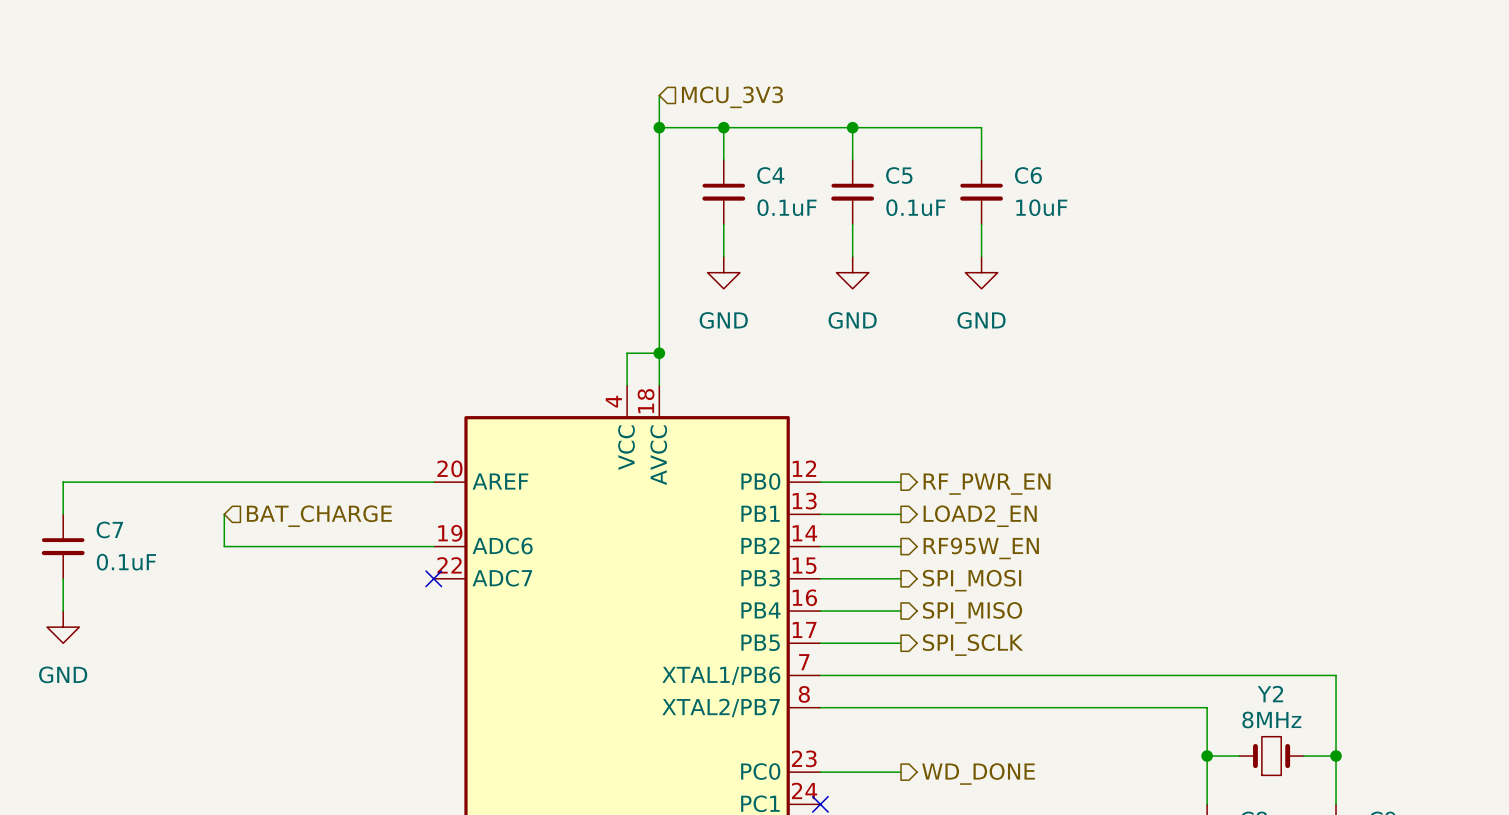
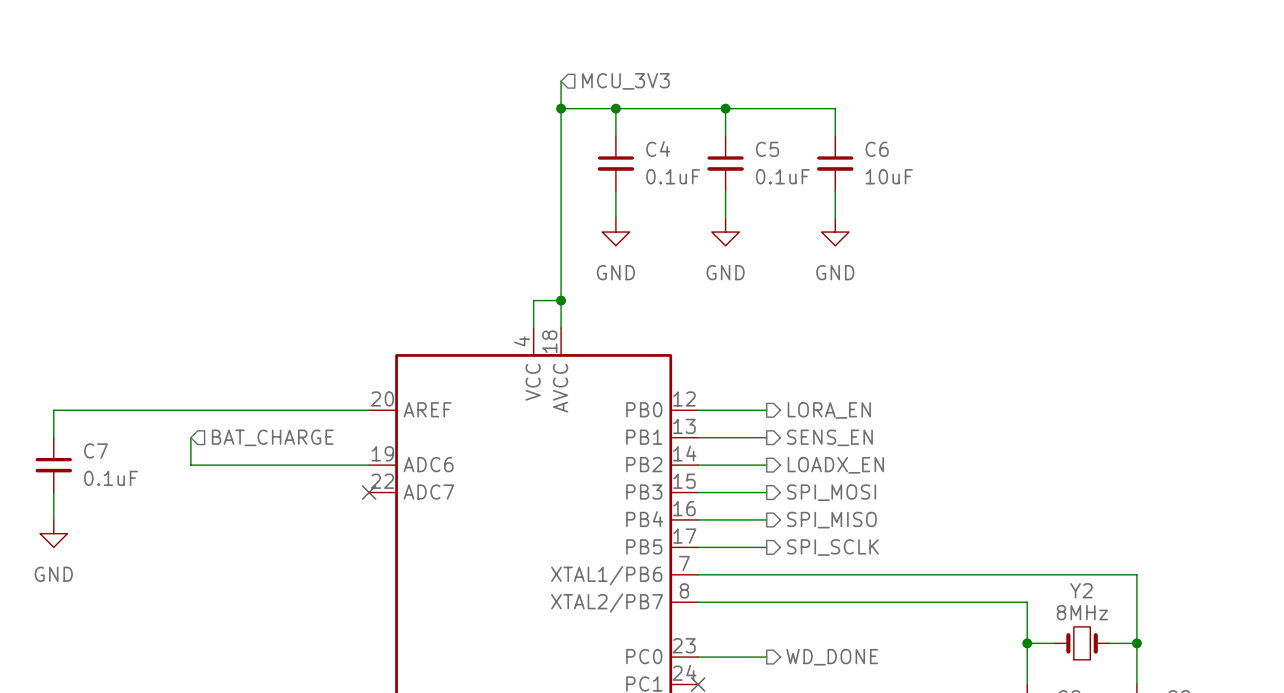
hierarchical label: RF_PWR_EN (987, 484) -> LORA_EN (829, 410)
hierarchical label: LOAD2_EN (980, 516) -> SENS_EN (829, 437)
hierarchical label: RF95W_EN (981, 548) -> LOADX_EN (835, 465)

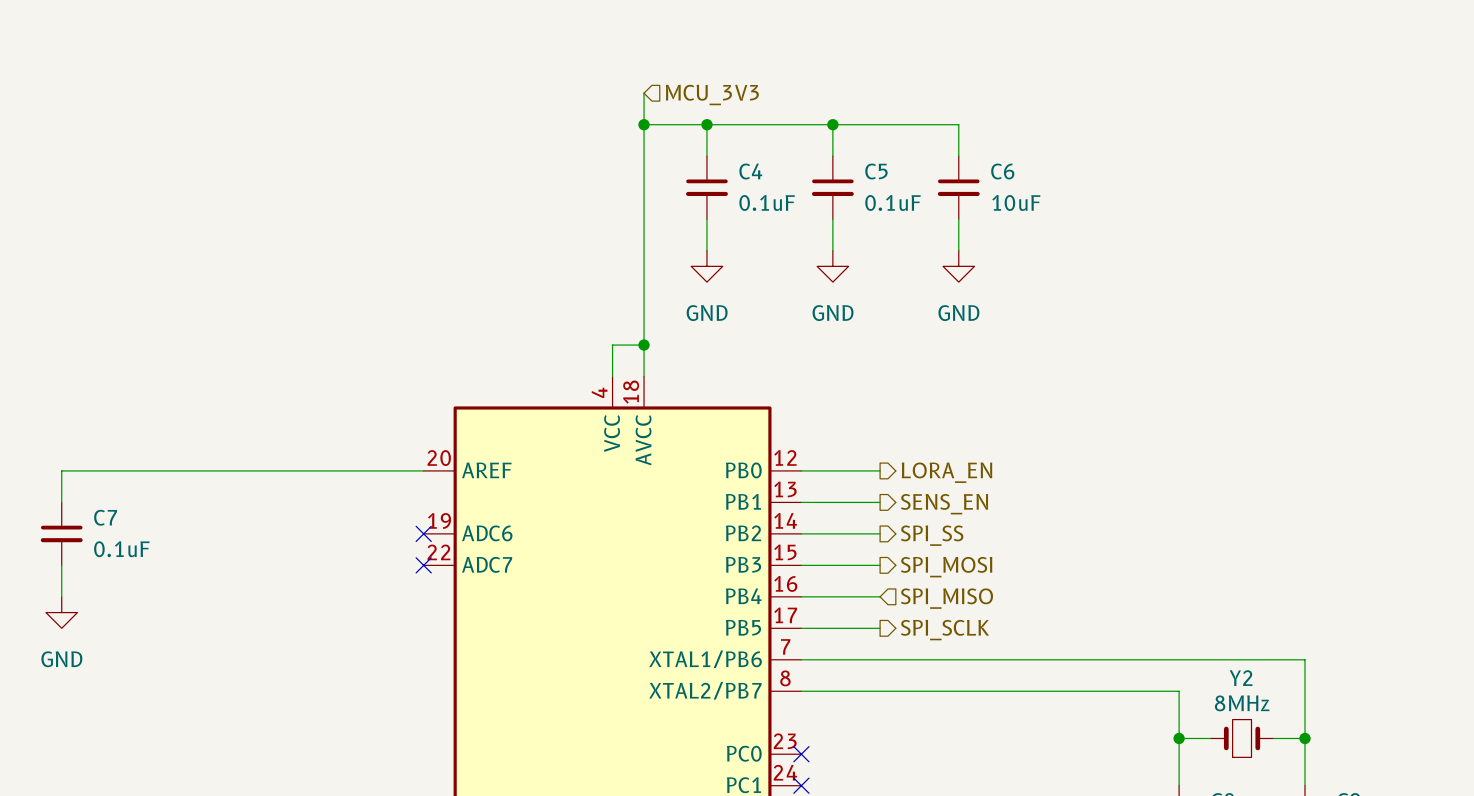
wire: (190, 437) (190, 465) (369, 465) -> none
hierarchical label: BAT_CHARGE (272, 437) -> none
no-connect mark: none -> (423, 533)
hierarchical label: LOADX_EN (835, 465) -> SPI_SS (932, 535)
hierarchical label shape: output (831, 520) -> input (946, 598)
wire: (698, 657) (766, 657) -> none
no-connect mark: none -> (801, 754)
hierarchical label: WD_DONE (832, 657) -> none

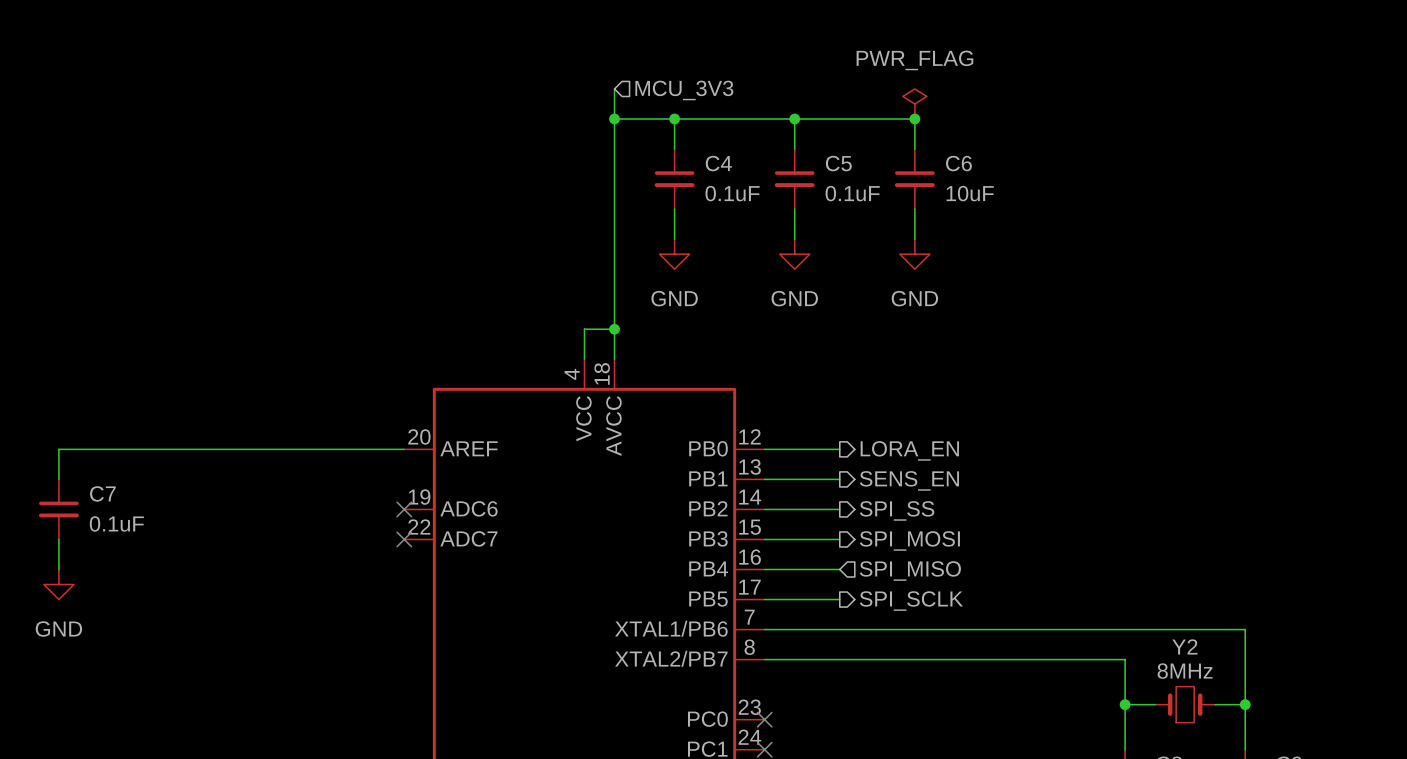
power symbol: none -> PWR_FLAG (914, 103)
junction: none -> (914, 119)

